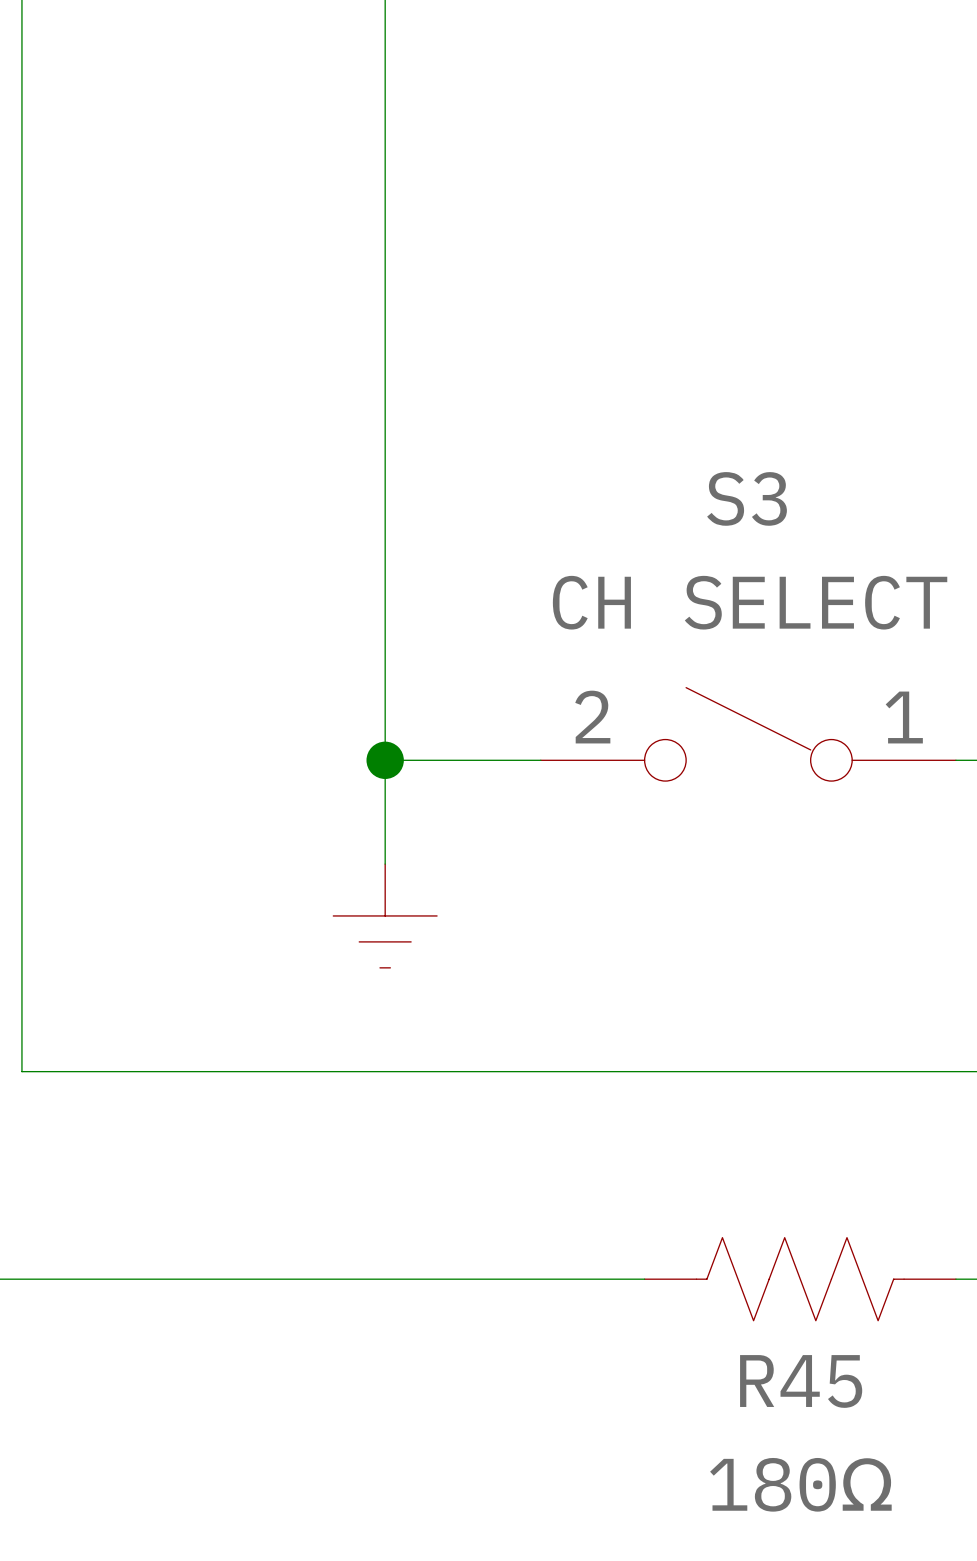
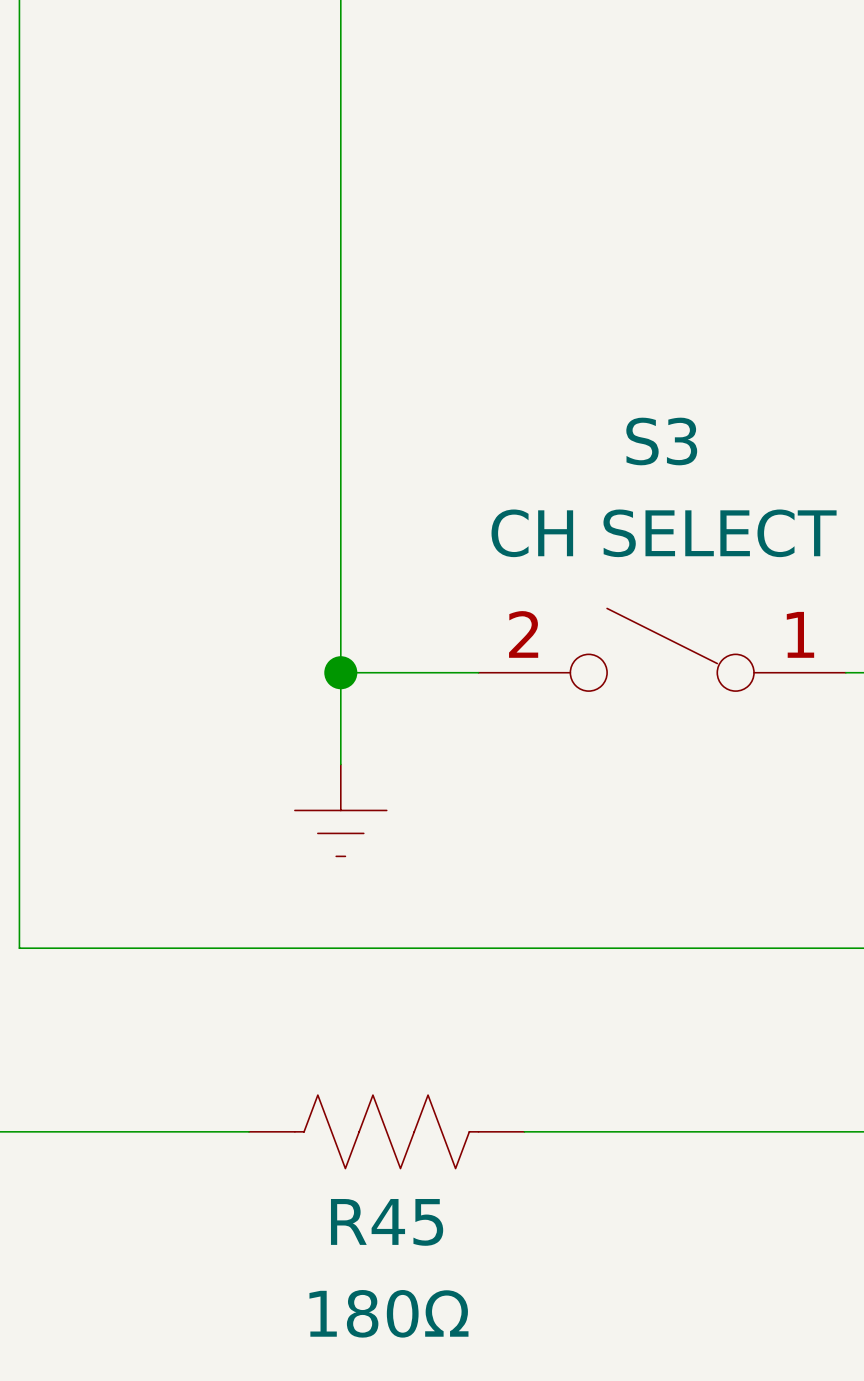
wire: (281, 1279) (592, 1279) -> (570, 1131) (845, 1131)
R45 position: (800, 1279) -> (386, 1131)

